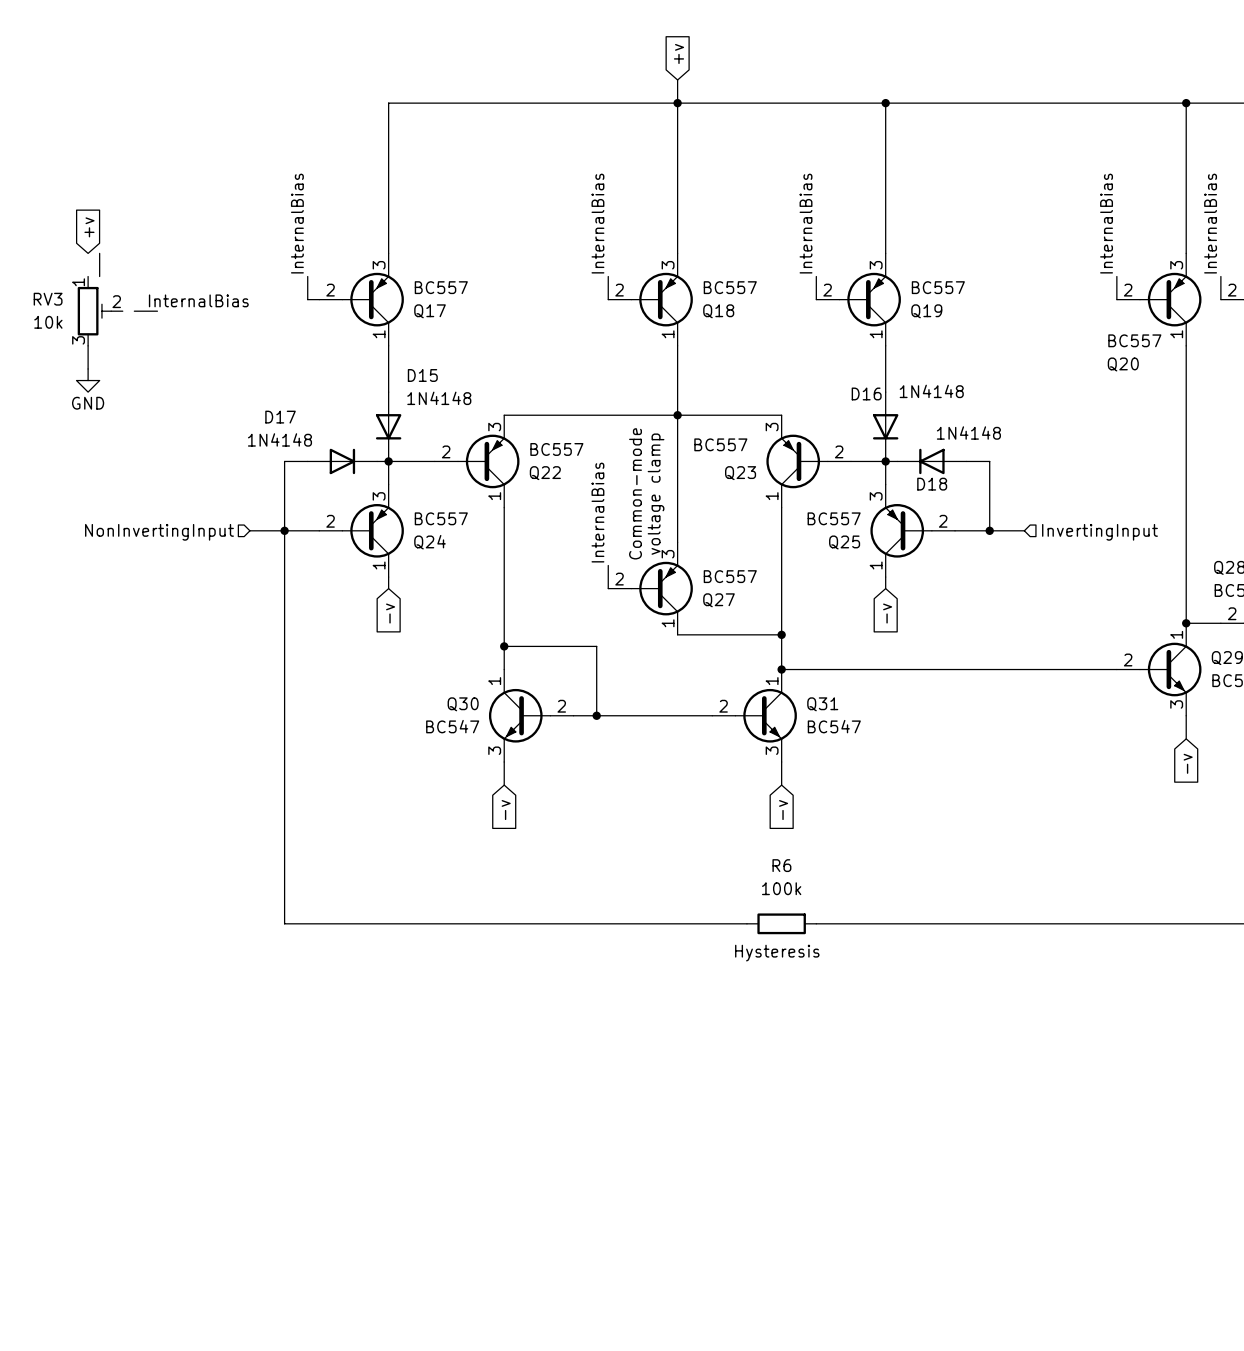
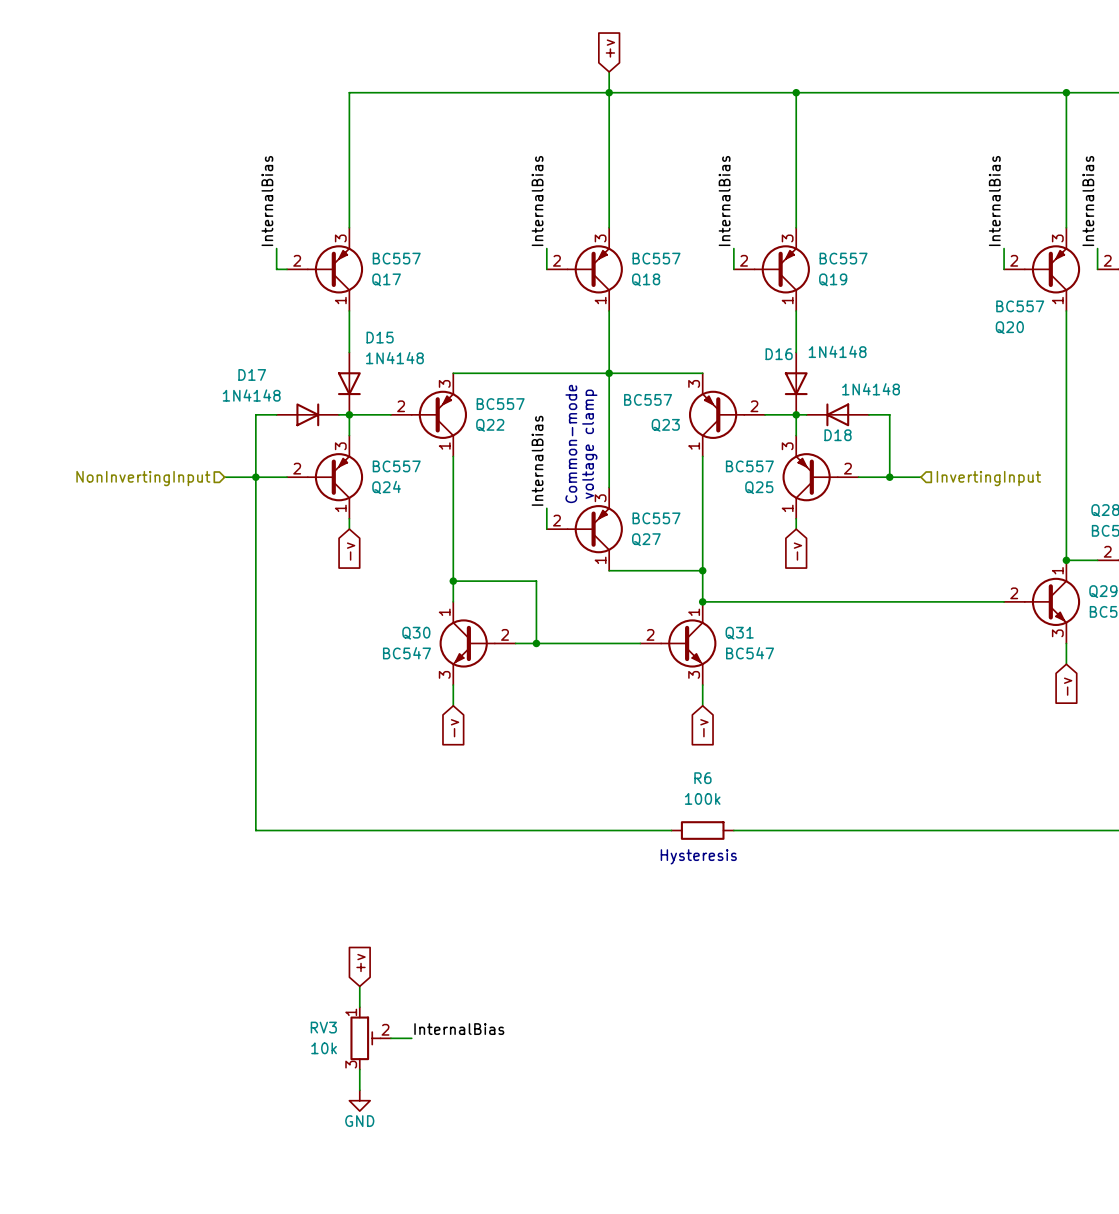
global label: +v (89, 227) -> none
wire: (99, 253) (99, 276) -> none
label: InternalBias (198, 300) -> none
RV3 position: (100, 311) -> (370, 1038)
wire: (134, 311) (157, 311) -> none
wire: (88, 345) (88, 368) -> none
power symbol: GND (88, 380) -> none
global label: none -> +v (361, 962)
wire: none -> (359, 986) (359, 1007)
label: none -> InternalBias (459, 1029)
wire: none -> (390, 1038) (411, 1038)
wire: none -> (359, 1069) (359, 1090)
power symbol: none -> GND (359, 1100)

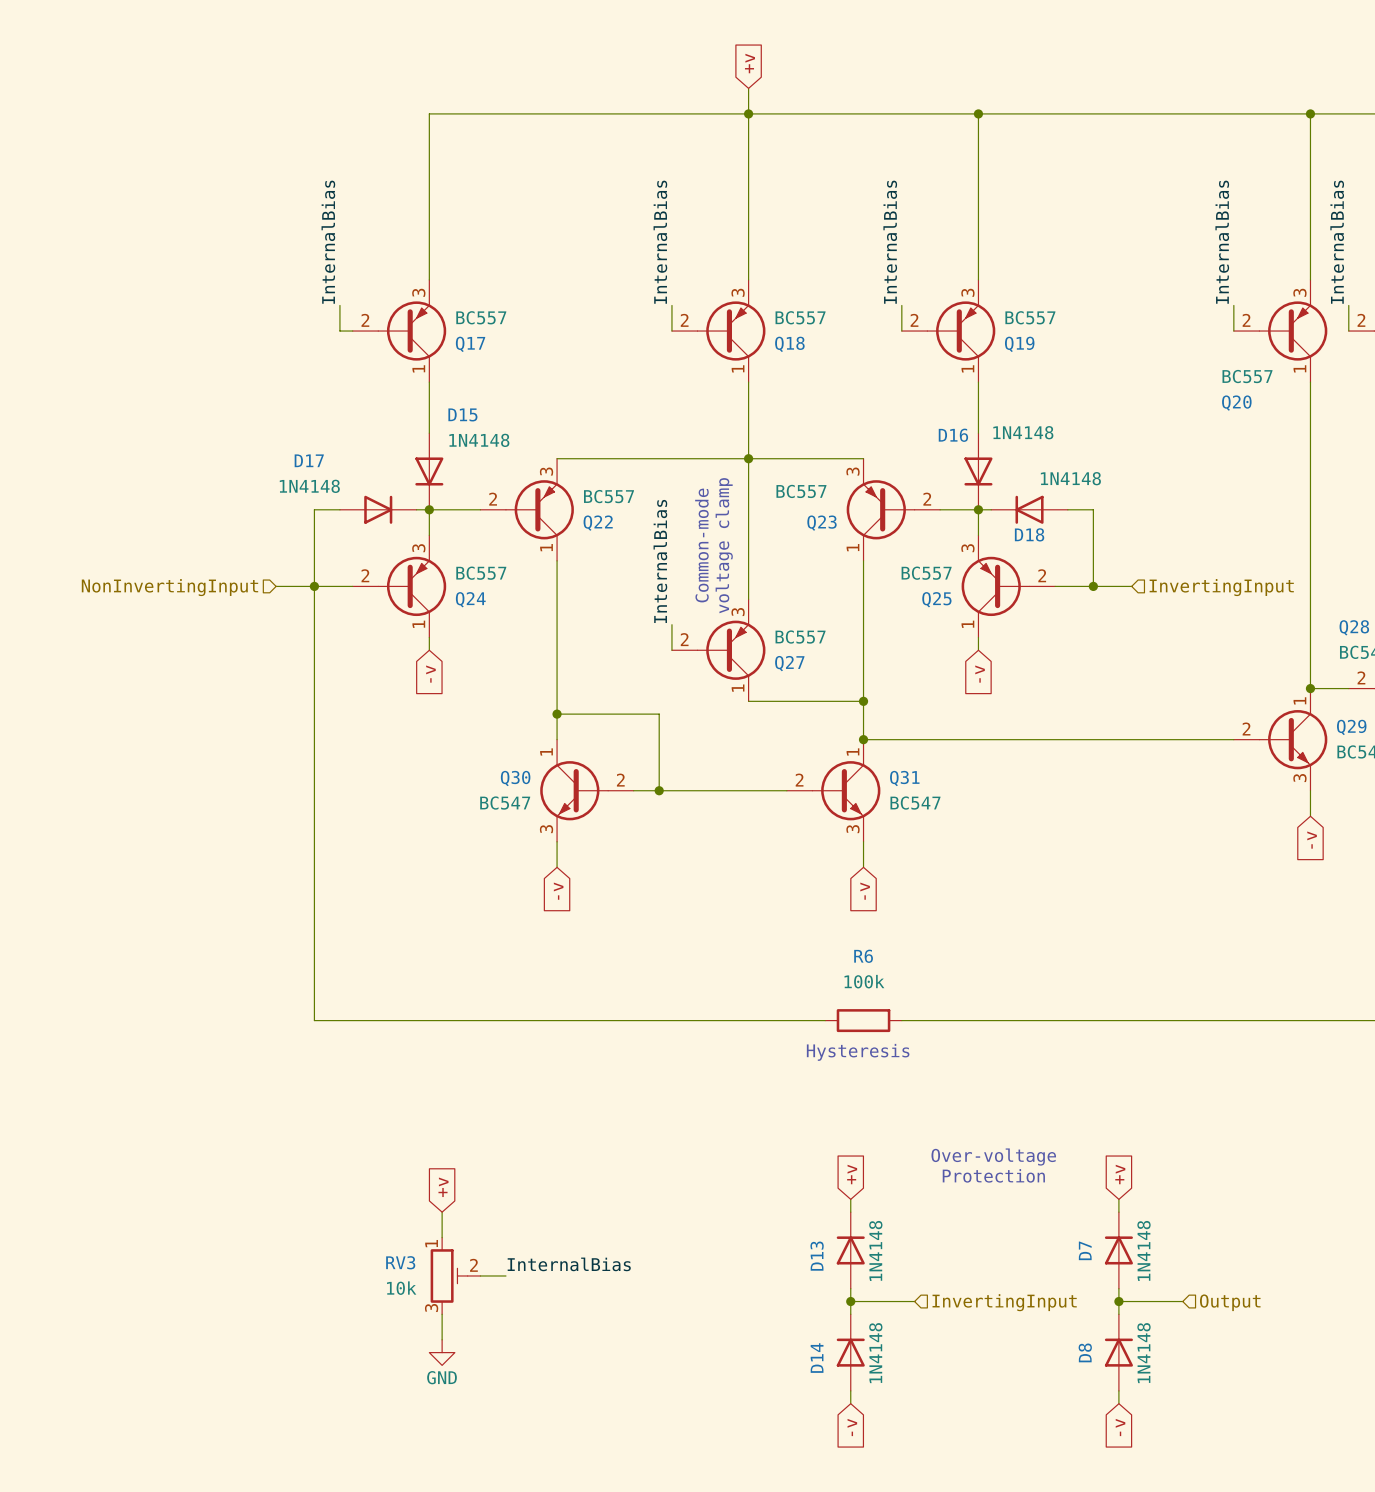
text: none -> Over-voltage (993, 1157)
global label: none -> +v (852, 1174)
global label: none -> +v (1120, 1174)
text: none -> Protection (993, 1175)
wire: none -> (850, 1199) (850, 1212)
wire: none -> (1118, 1199) (1118, 1212)
D13: none -> 1N4148 (850, 1250)
D7: none -> 1N4148 (1118, 1250)
wire: none -> (850, 1288) (850, 1314)
wire: none -> (1118, 1288) (1118, 1314)
wire: none -> (850, 1301) (914, 1301)
junction: none -> (850, 1301)
wire: none -> (1118, 1301) (1182, 1301)
junction: none -> (1118, 1301)
hierarchical label: none -> InvertingInput (1004, 1302)
hierarchical label: none -> Output (1230, 1302)
D14: none -> 1N4148 (850, 1352)
D8: none -> 1N4148 (1118, 1352)
wire: none -> (850, 1390) (850, 1403)
wire: none -> (1118, 1390) (1118, 1403)
global label: none -> -v (852, 1427)
global label: none -> -v (1120, 1427)

